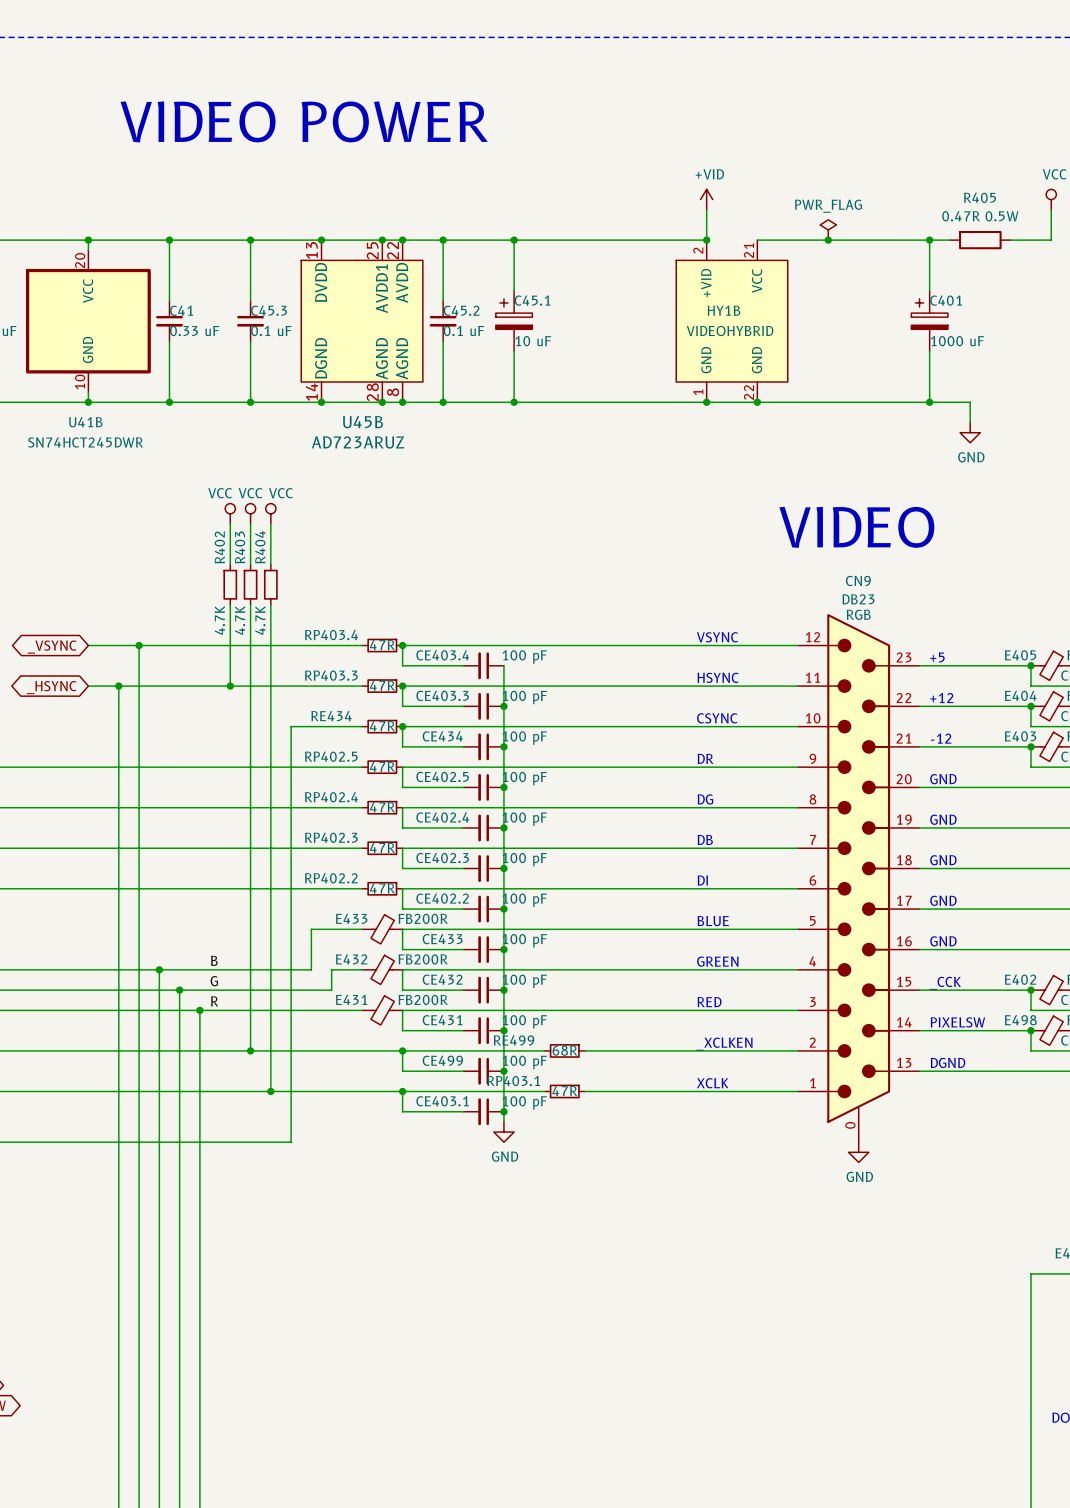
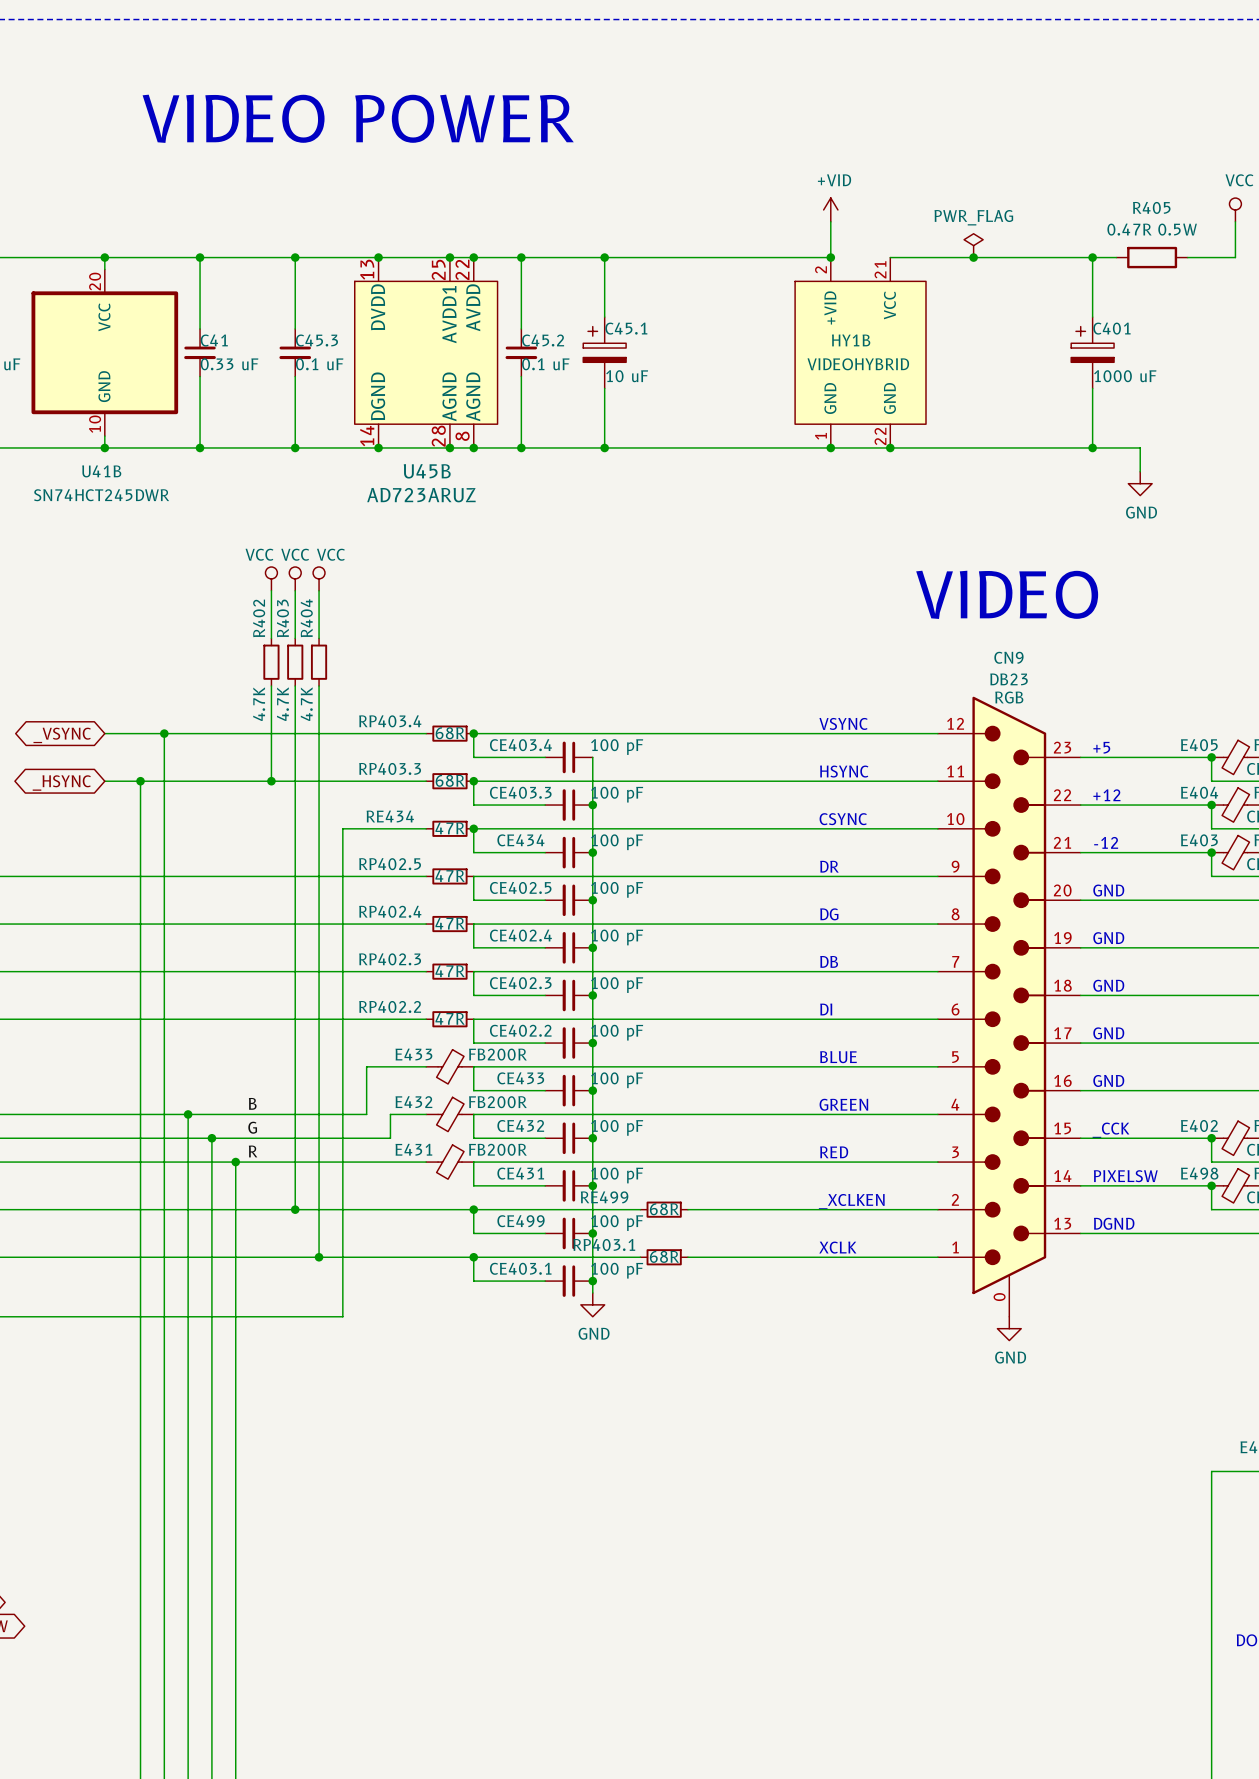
RP403.4 value: 47R (382, 645) -> 68R (450, 733)
RP403.3 value: 47R (382, 685) -> 68R (450, 780)
RP403.1 value: 47R (564, 1091) -> 68R (664, 1256)

